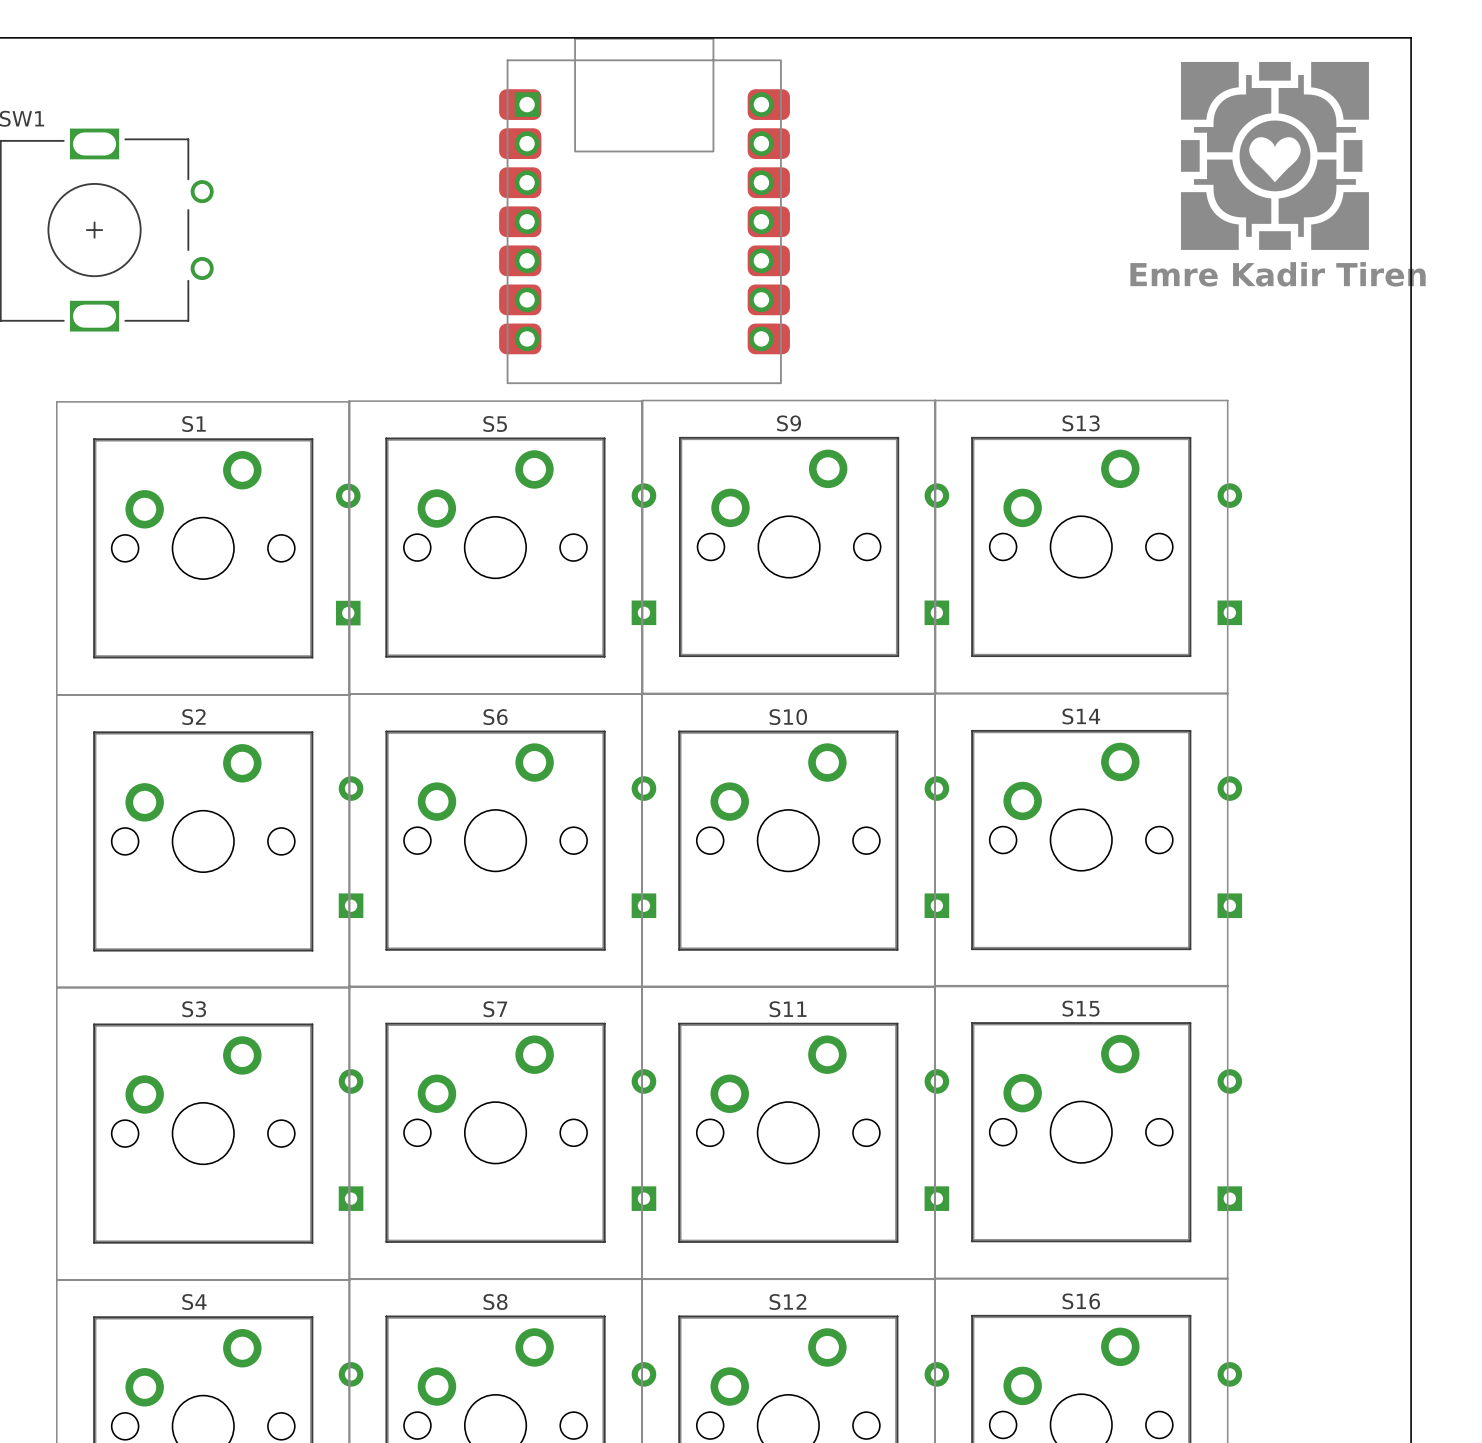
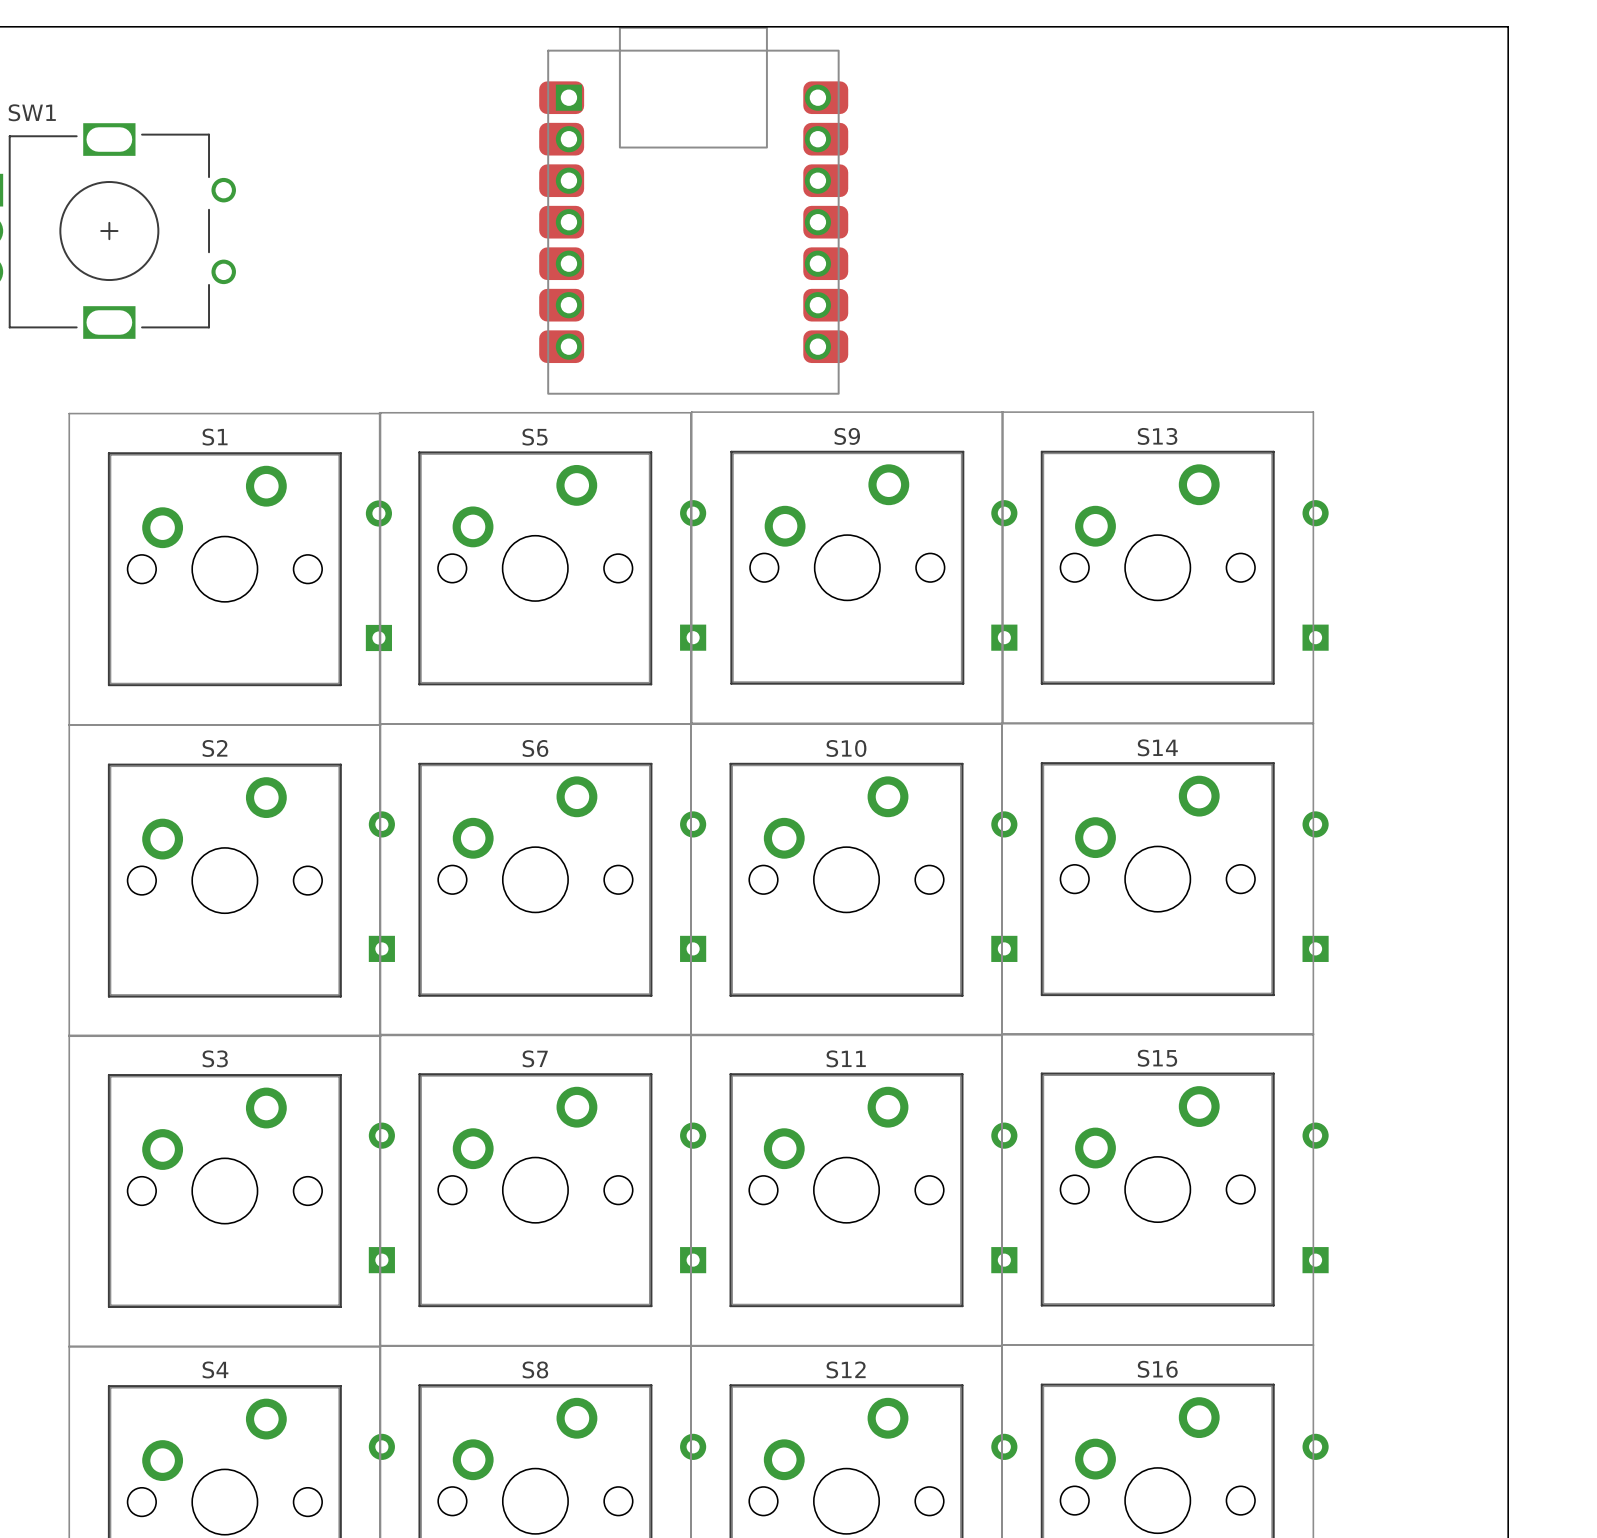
drawing: [1180, 61, 1369, 250] -> none
text: Emre Kadir Tiren (1278, 274) -> none

